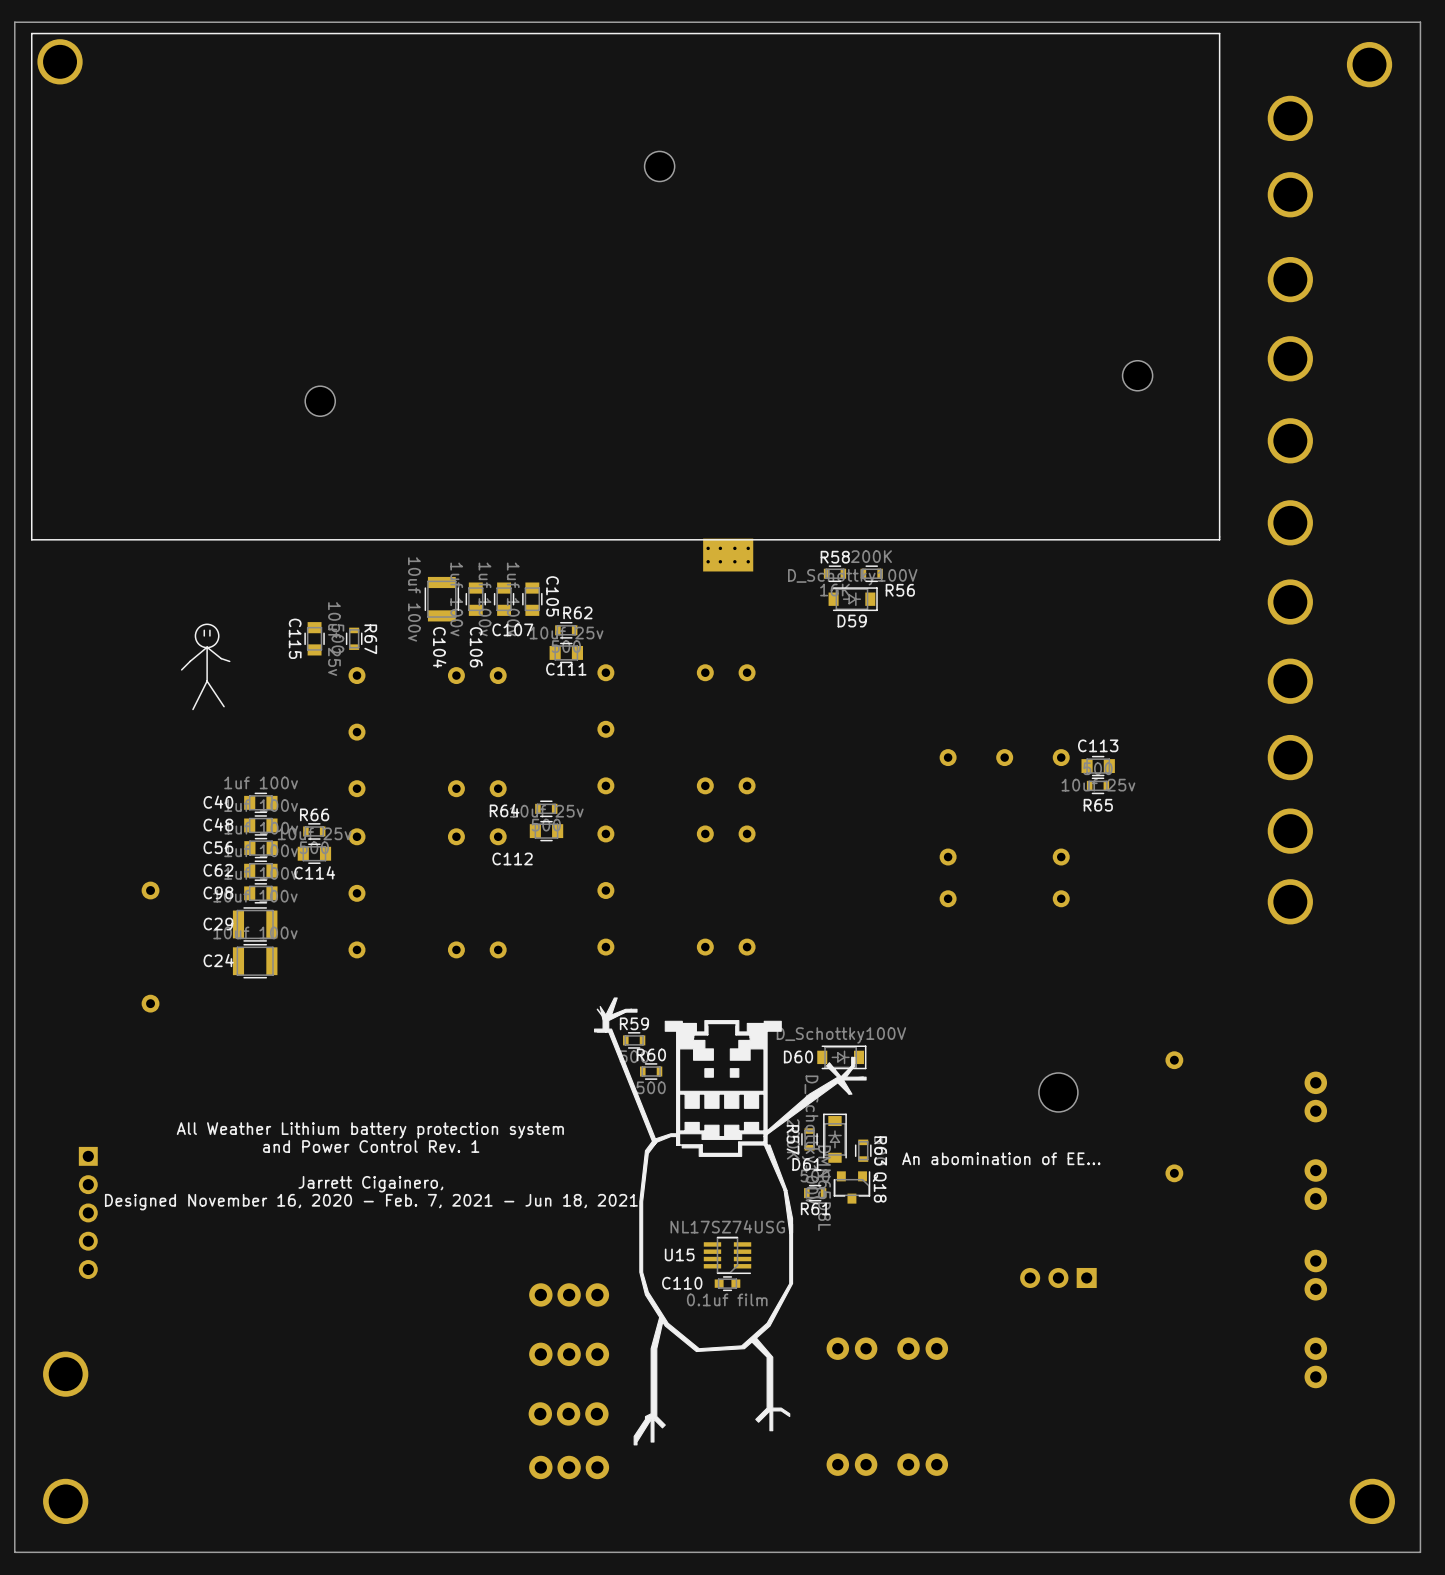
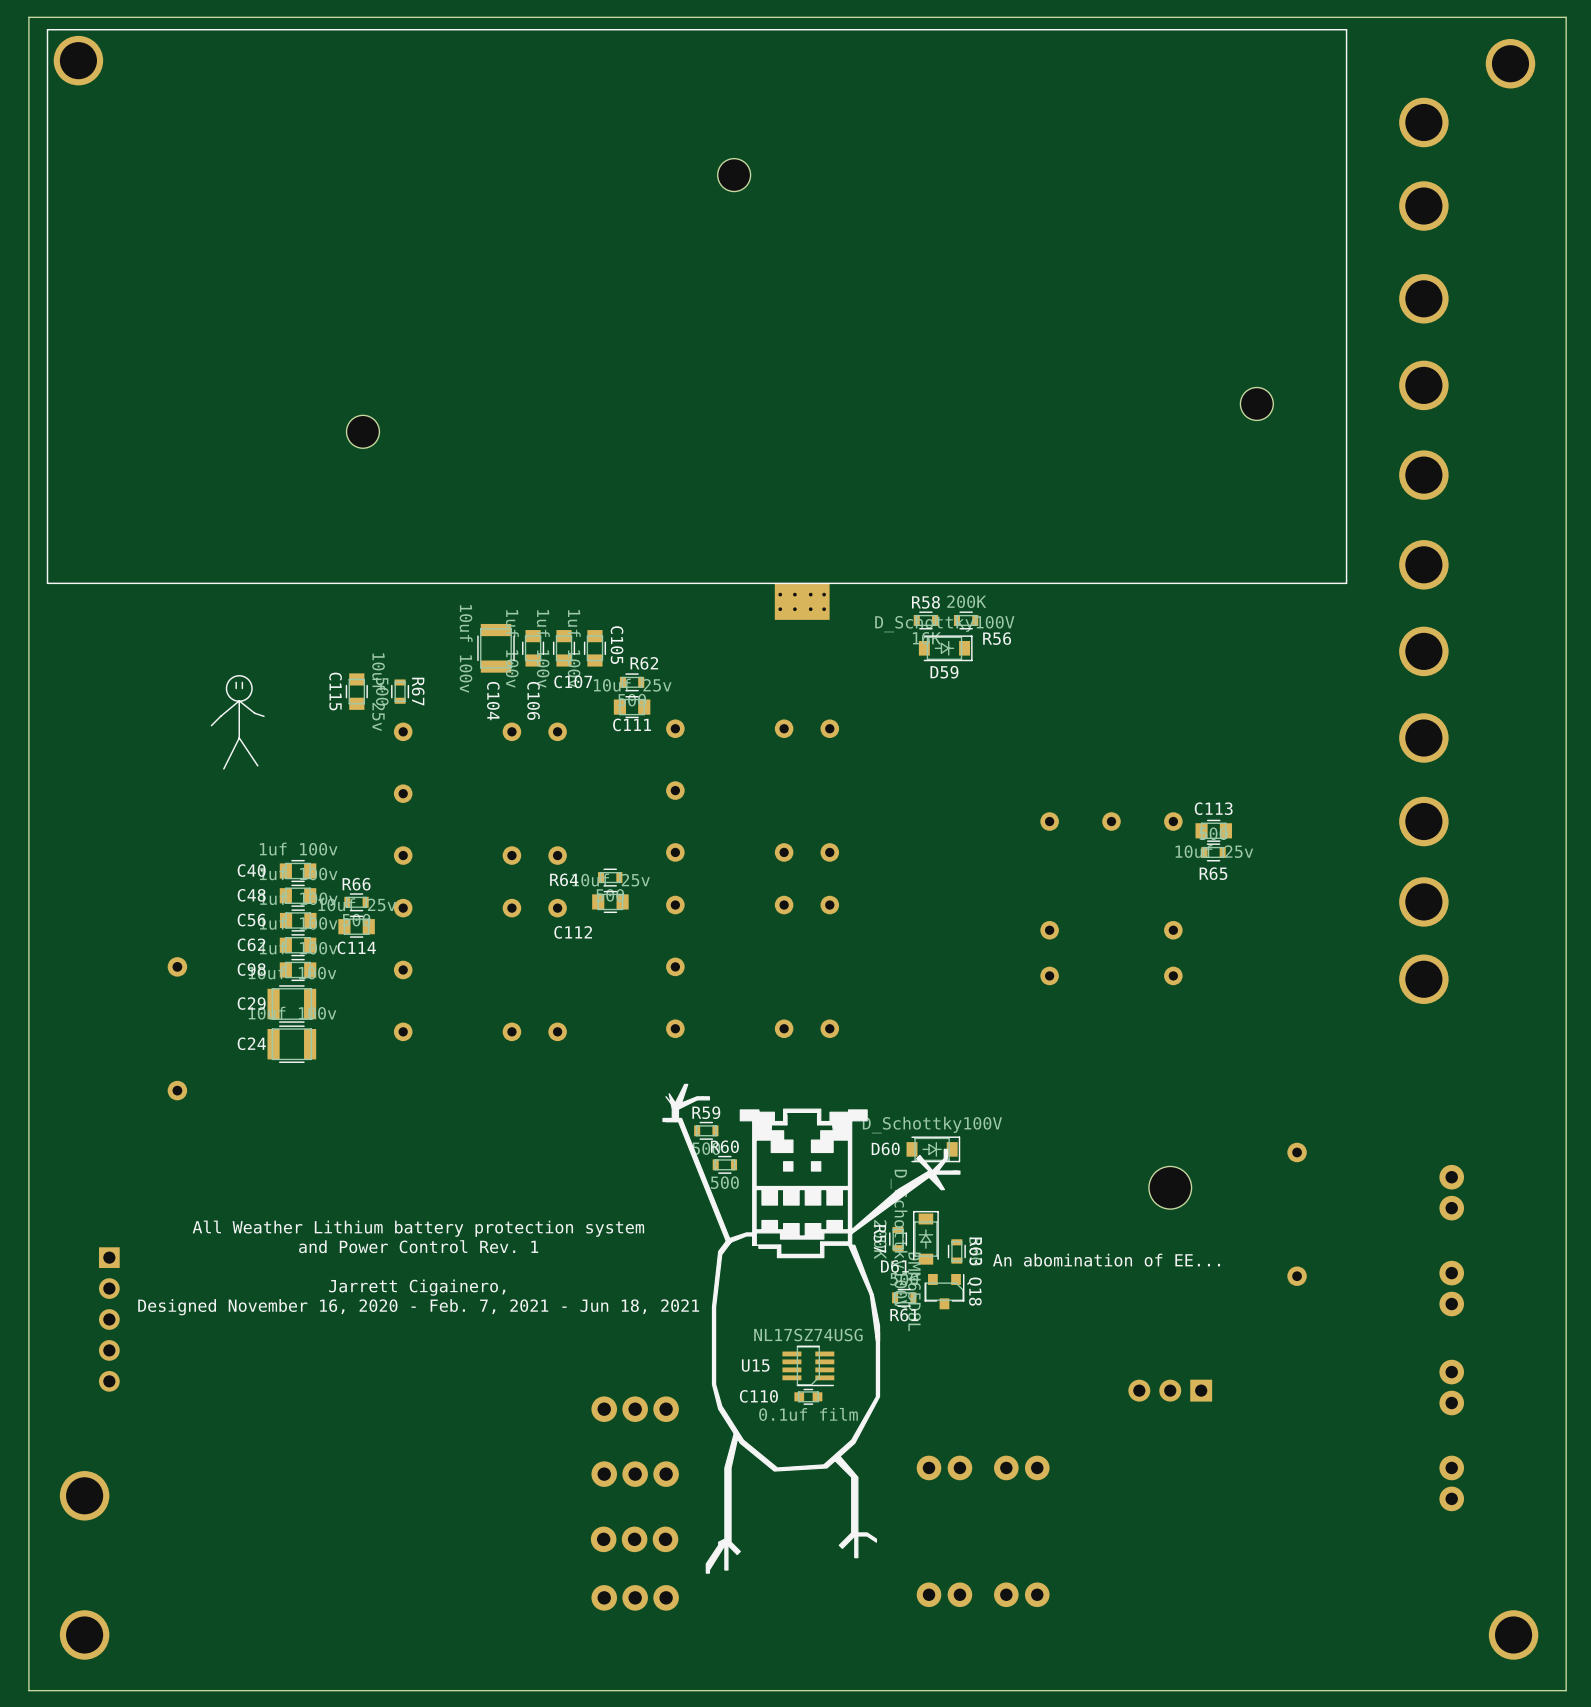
part rotation: 0° (728, 555) -> 180° (802, 601)

